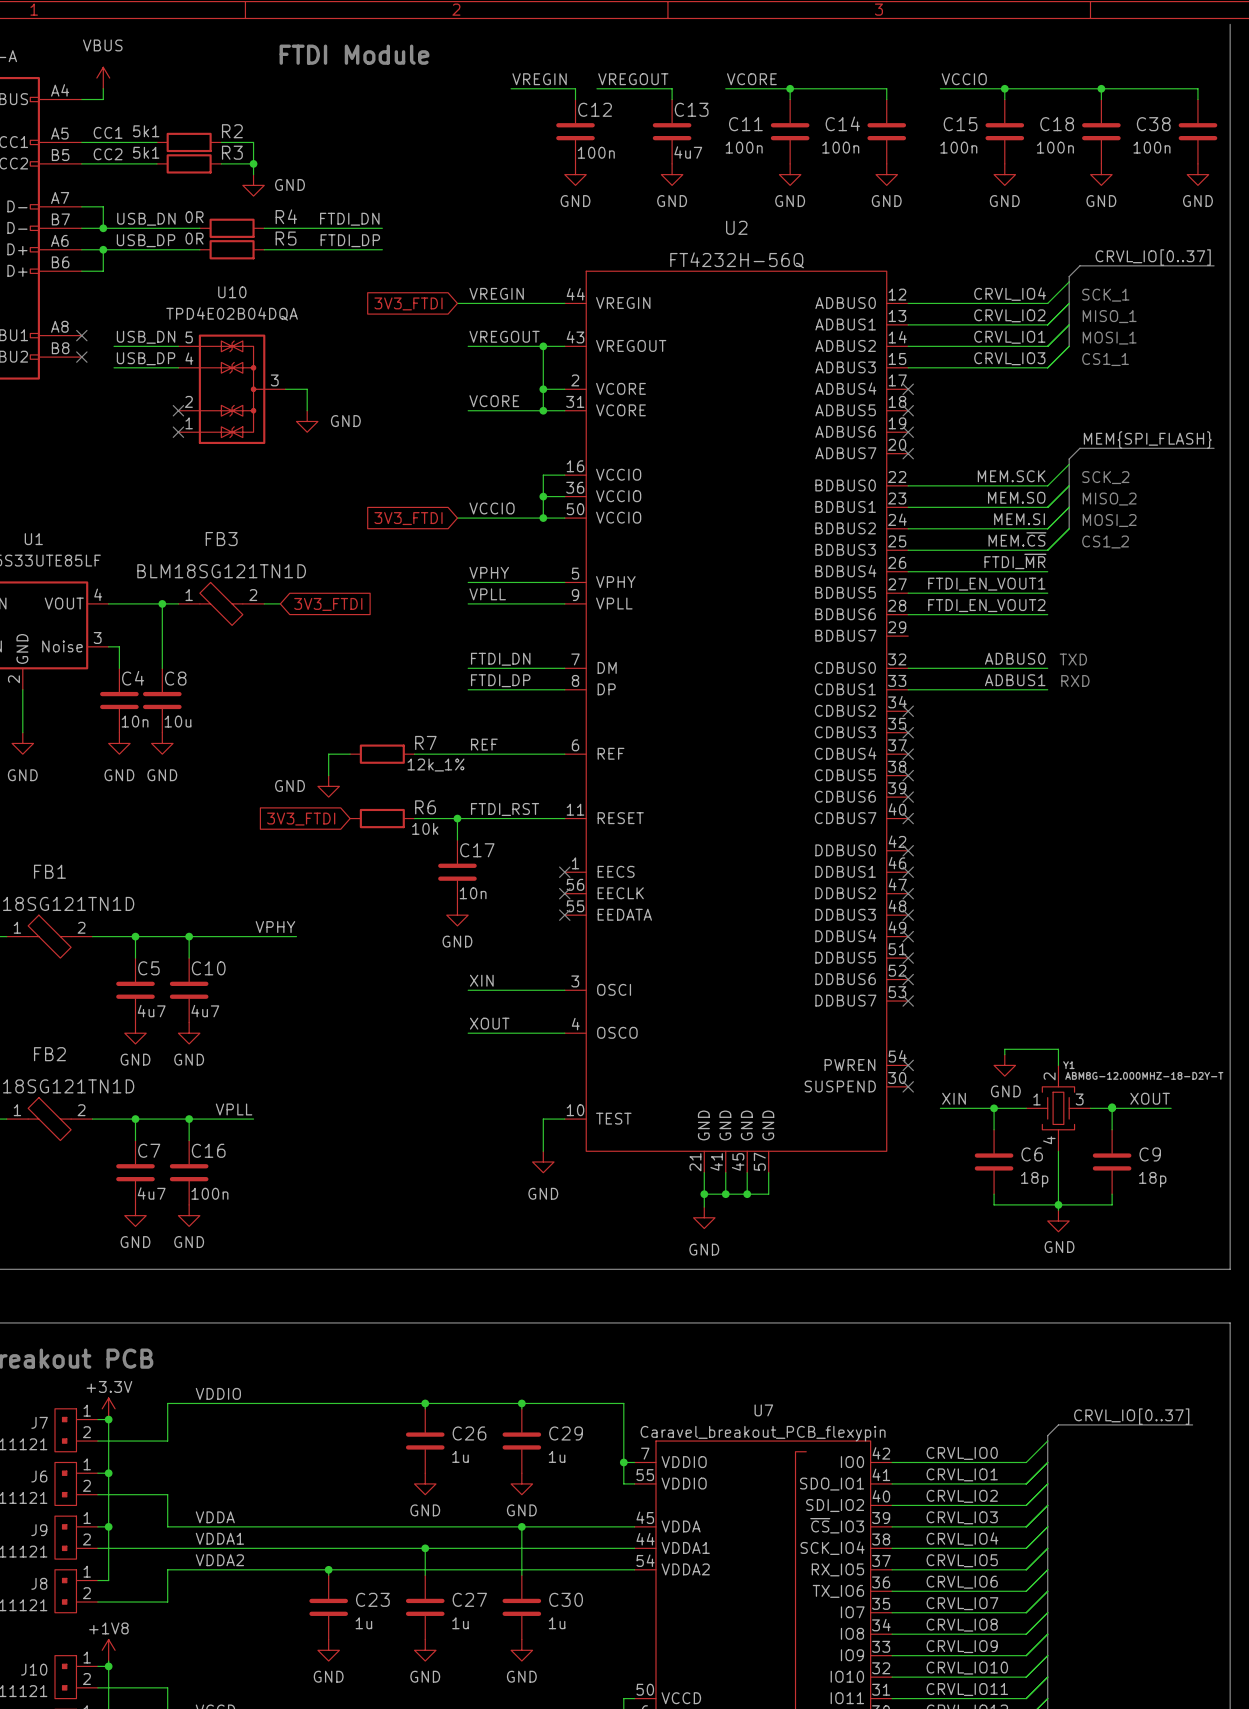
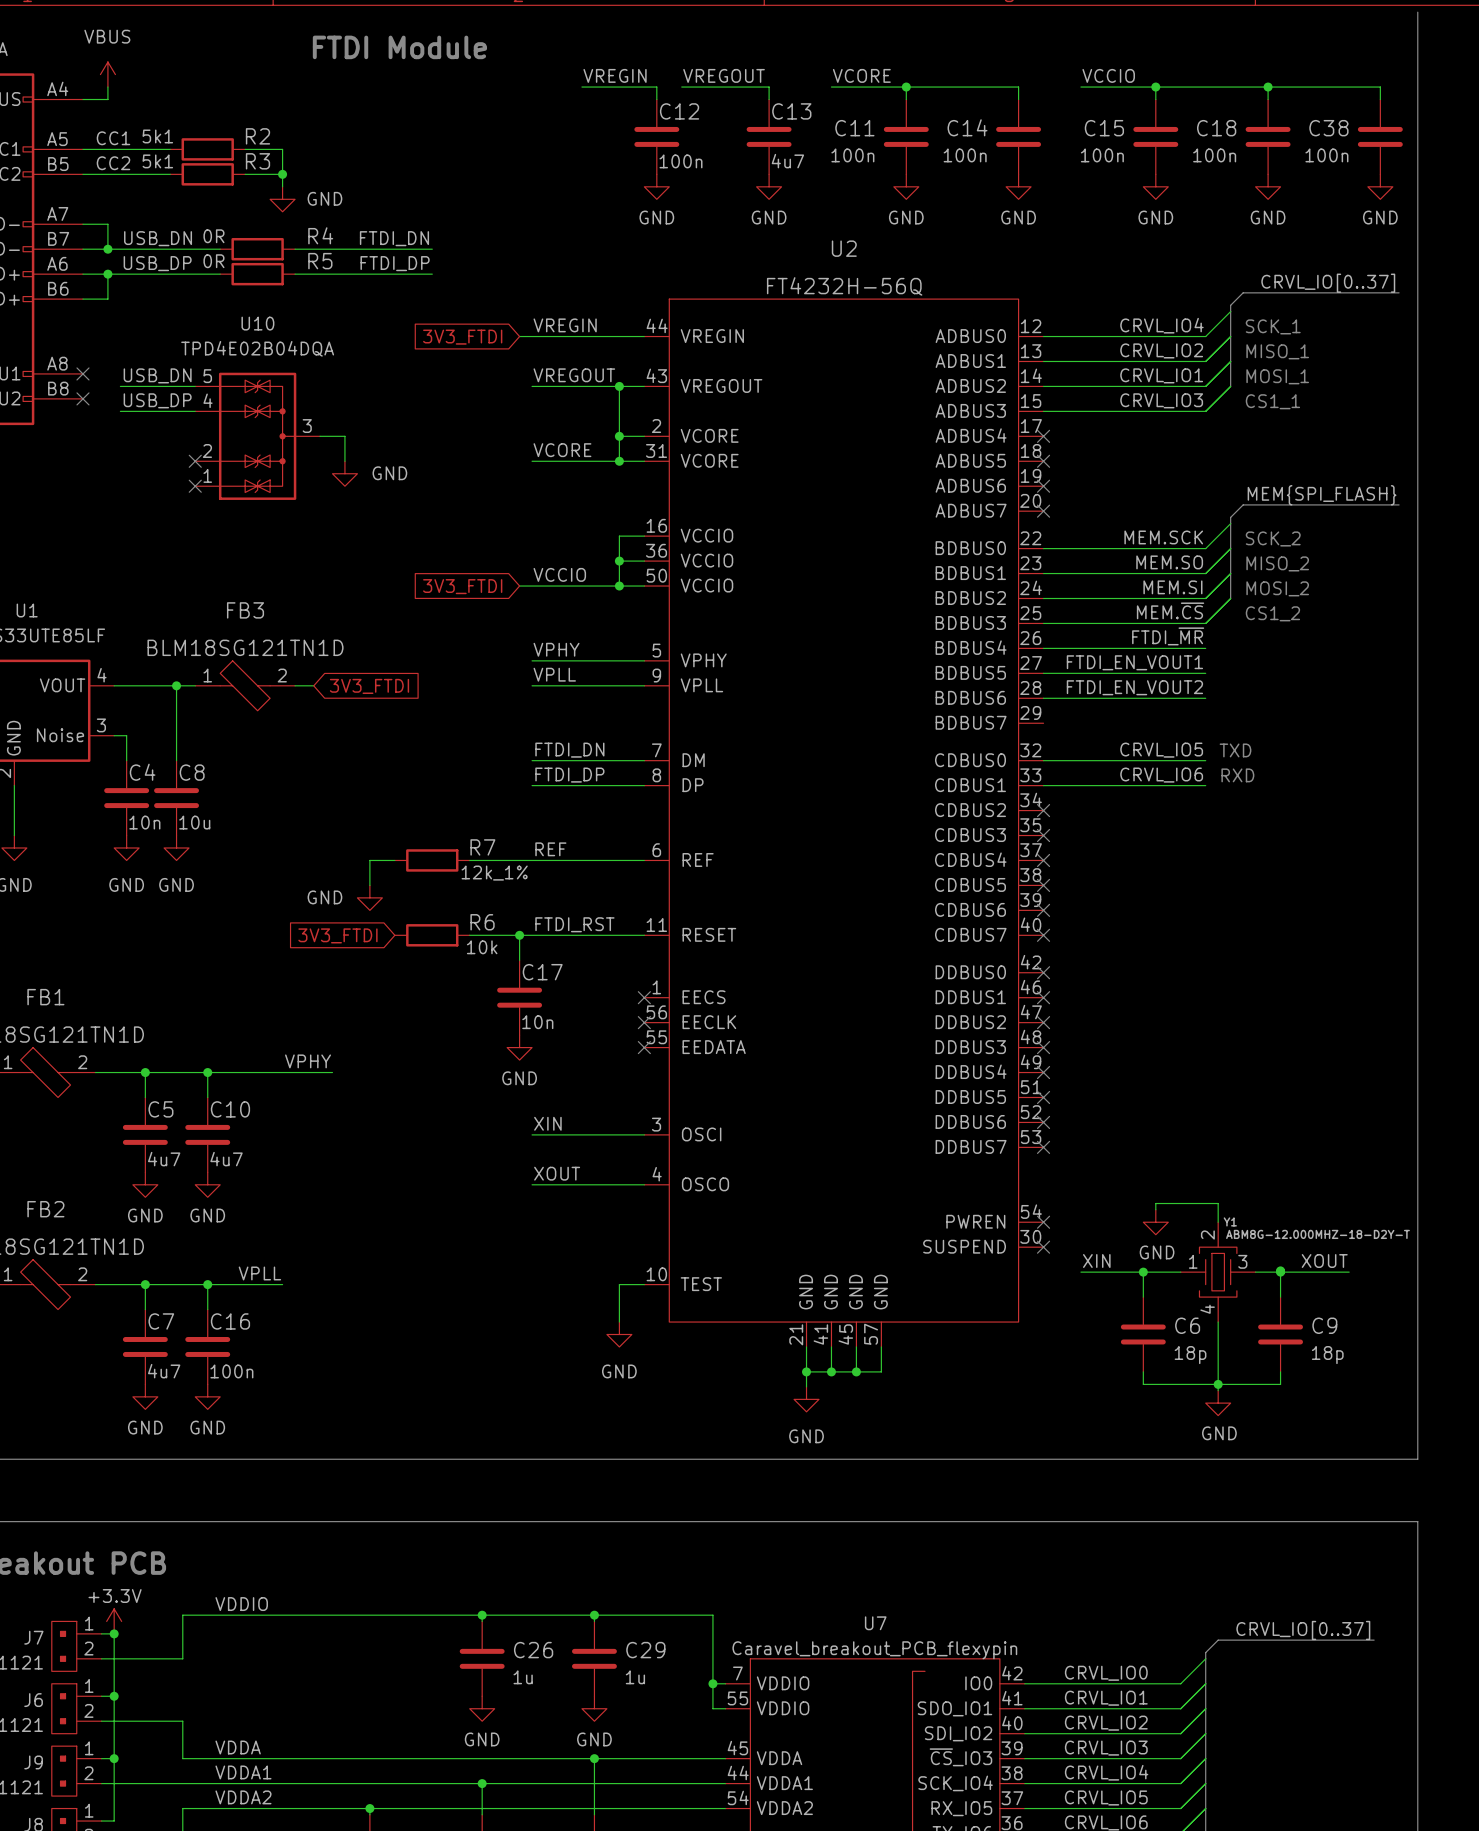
label: ADBUS0 (1015, 658) -> CRVL_IO5 (1161, 750)
label: ADBUS1 (1015, 680) -> CRVL_IO6 (1161, 775)

